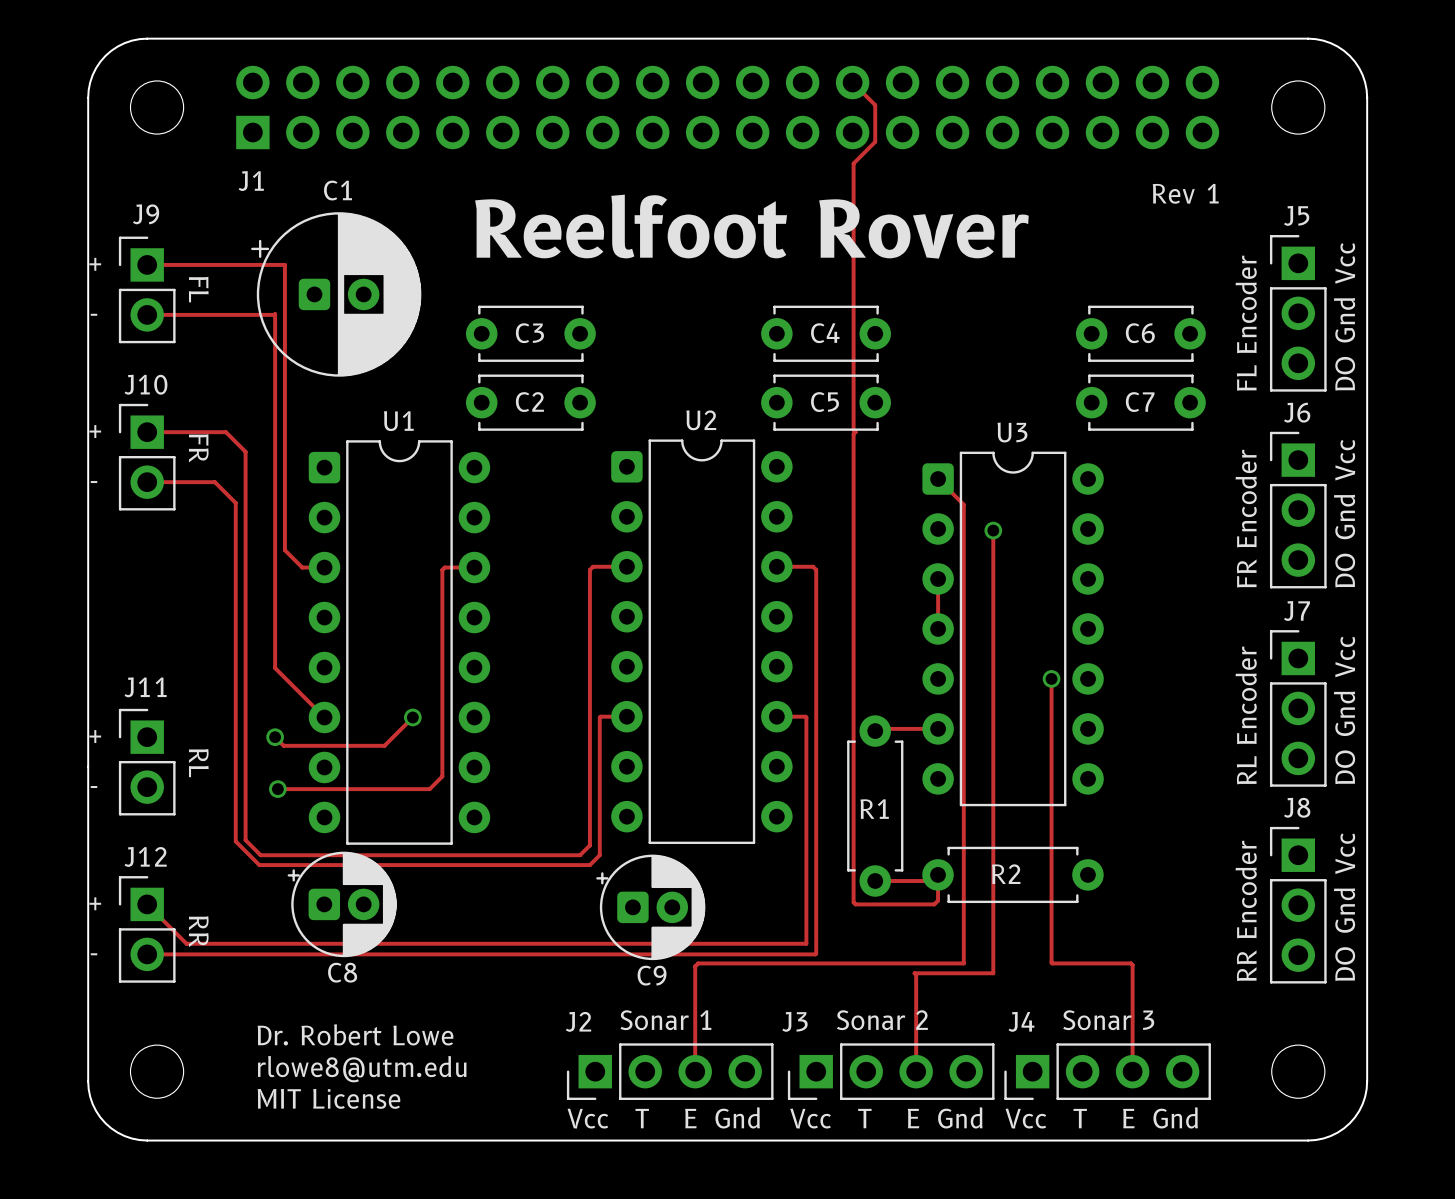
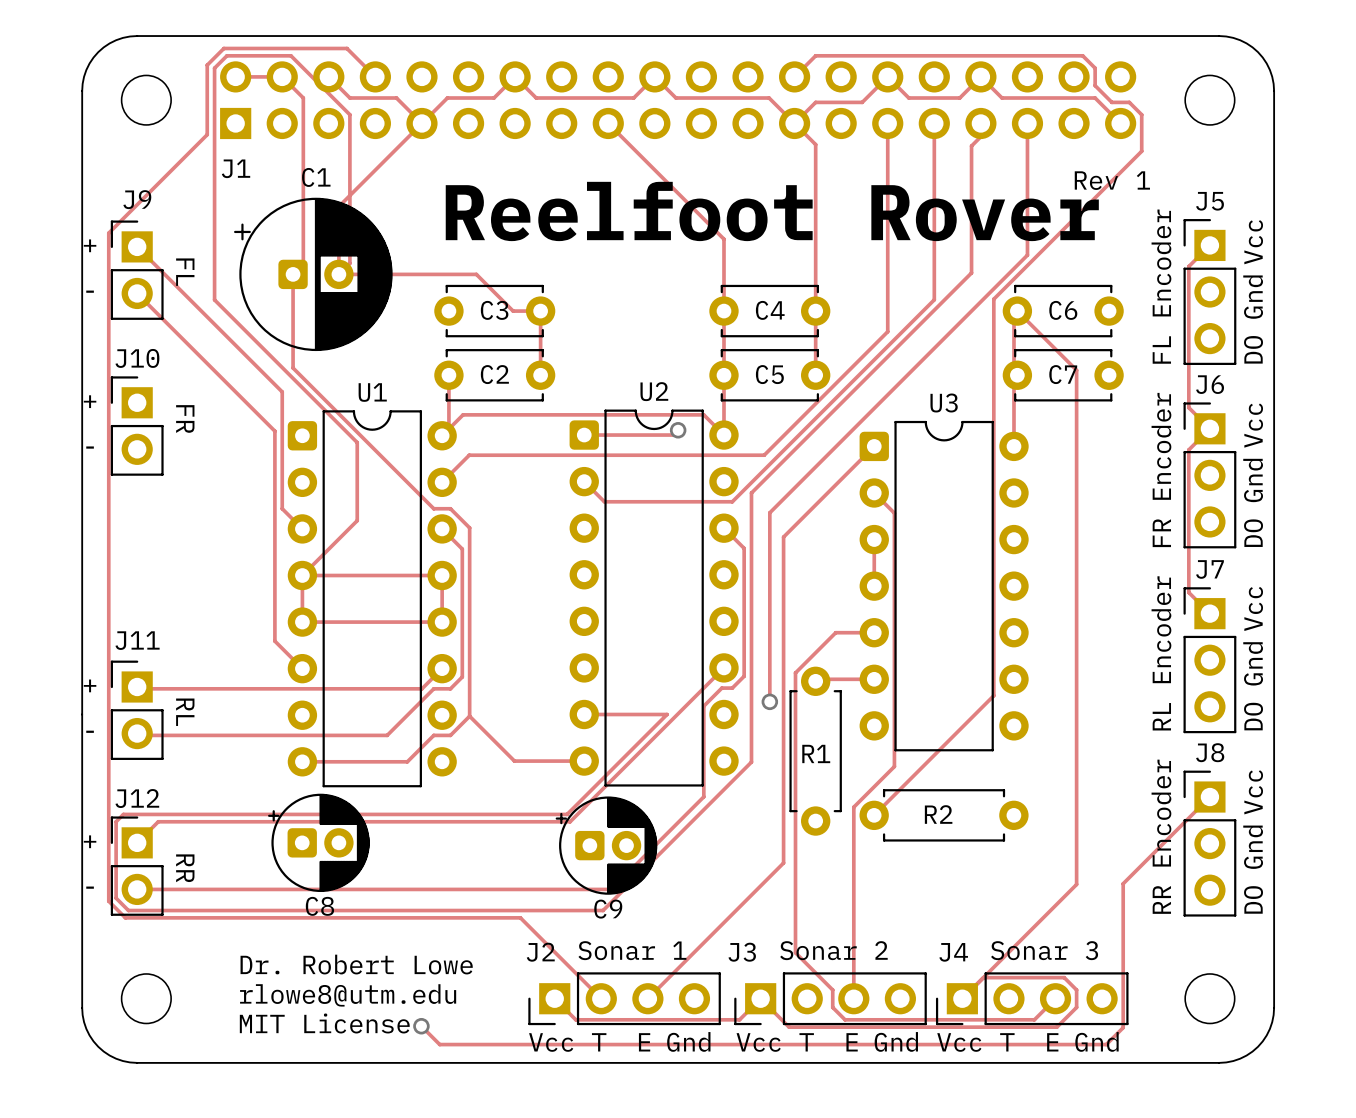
track: none -> (235, 76) (282, 76) (303, 98) (303, 264) (293, 274) (293, 368) (433, 508) (450, 508) (469, 527) (469, 716)
track: none -> (328, 76) (349, 98) (396, 98) (421, 123)
track: none -> (375, 76) (346, 48) (223, 48) (207, 65) (207, 134) (108, 233) (108, 901) (125, 917) (520, 917) (601, 998)
track: (852, 82) (875, 105) (875, 141) (853, 163) (853, 430) (855, 432) (853, 434) (853, 722) -> (794, 76) (815, 55) (1082, 55) (1095, 68) (1095, 85) (1111, 102) (1129, 102) (1141, 114) (1141, 151) (993, 299) (993, 695) (874, 815)
track: none -> (608, 123) (723, 239) (723, 435) (703, 414) (463, 414) (442, 435)
track: none -> (794, 123) (815, 102) (862, 102) (887, 76) (908, 98) (959, 98) (980, 76) (1001, 98) (1095, 98) (1120, 123)
track: none -> (887, 123) (887, 331) (764, 455) (469, 455) (442, 482)
track: none -> (934, 123) (934, 299) (732, 501) (604, 501) (584, 481)
track: none -> (1027, 123) (1027, 255) (769, 512) (769, 701)
track: none -> (1209, 245) (1188, 266) (1188, 407) (1209, 428) (1188, 449) (1188, 592) (1209, 613)
track: (147, 264) (284, 264) (284, 550) (302, 567) (324, 567) -> (137, 246) (282, 391) (282, 508) (302, 528)
track: none -> (338, 274) (349, 263) (349, 114) (290, 55) (226, 55) (214, 68) (214, 299) (357, 442) (357, 520) (302, 575)
track: none -> (338, 274) (476, 274) (513, 311) (540, 311) (540, 375)
track: none -> (338, 274) (338, 206) (447, 98) (494, 98) (515, 76) (536, 98) (633, 98) (654, 76) (675, 98) (769, 98) (815, 144) (815, 375)
track: (147, 314) (275, 314) (275, 668) (294, 687) -> (137, 293) (274, 431) (274, 641)
track: none -> (448, 375) (448, 428)
track: (147, 432) (225, 432) (245, 451) (245, 840) (260, 855) (580, 855) (589, 845) (589, 569) (593, 566) (626, 566) -> none
track: none -> (678, 430) (673, 435) (584, 435)
via: none -> (678, 430)
track: (938, 479) (963, 504) (963, 963) (698, 963) (695, 966) (695, 1071) -> (874, 446) (783, 537) (783, 863) (647, 998)
track: none -> (1013, 446) (1013, 314) (1017, 311) (1076, 370) (1076, 884) (962, 998)
track: (147, 482) (214, 482) (235, 503) (235, 841) (259, 865) (589, 865) (599, 855) (599, 717) (626, 716) -> none
track: (993, 530) (993, 973) (914, 973) (916, 974) -> (874, 492) (894, 513) (894, 766) (853, 807) (853, 908)
via: (993, 530) -> none
track: (776, 566) (813, 566) (816, 569) (816, 953) (655, 954) -> (723, 528) (744, 548) (744, 676) (732, 688) (721, 688) (703, 706) (703, 796) (611, 889)
track: (474, 567) (444, 567) (442, 569) (442, 776) (429, 789) (415, 789) -> (442, 528) (462, 549) (462, 677) (450, 688) (433, 688) (387, 735)
track: none -> (302, 575) (302, 622) (442, 622) (442, 575) (302, 575)
track: none -> (862, 632) (835, 632) (795, 672)
track: (1051, 678) (1051, 962) (1131, 963) (1132, 965) (1132, 1071) -> (795, 841) (795, 952) (832, 989) (832, 1007) (845, 1019) (1034, 1019) (1055, 998)
via: (1051, 678) -> none
track: (776, 716) (806, 717) -> (980, 123) (980, 136) (971, 146) (971, 272) (751, 493) (751, 668)
track: (412, 717) (384, 745) (283, 745) (275, 737) -> none
via: (412, 717) -> none
track: none -> (442, 668) (421, 688) (139, 688) (137, 686)
via: (275, 737) -> none
via: none -> (769, 701)
track: none -> (584, 714) (667, 714) (567, 814) (123, 814) (116, 821) (116, 898) (128, 910) (603, 910) (751, 762)
track: none -> (469, 716) (514, 761) (584, 761)
track: none -> (469, 716) (450, 735) (433, 735) (407, 761) (302, 761)
track: none -> (137, 733) (139, 735) (258, 735)
via: (277, 789) -> none
track: (806, 817) (806, 943) (186, 943) (147, 904) -> (723, 667) (570, 821) (158, 821) (137, 842)
track: none -> (1209, 797) (1123, 883) (1123, 1027) (1106, 1044) (439, 1044) (421, 1026)
track: (875, 881) (931, 881) (938, 874) (938, 900) (934, 904) (855, 904) (853, 902) -> none
track: none -> (983, 977) (1064, 977) (1076, 989) (1076, 1007) (1056, 1027) (789, 1027) (760, 998) (739, 1019) (575, 1019) (554, 998)
via: none -> (421, 1026)

